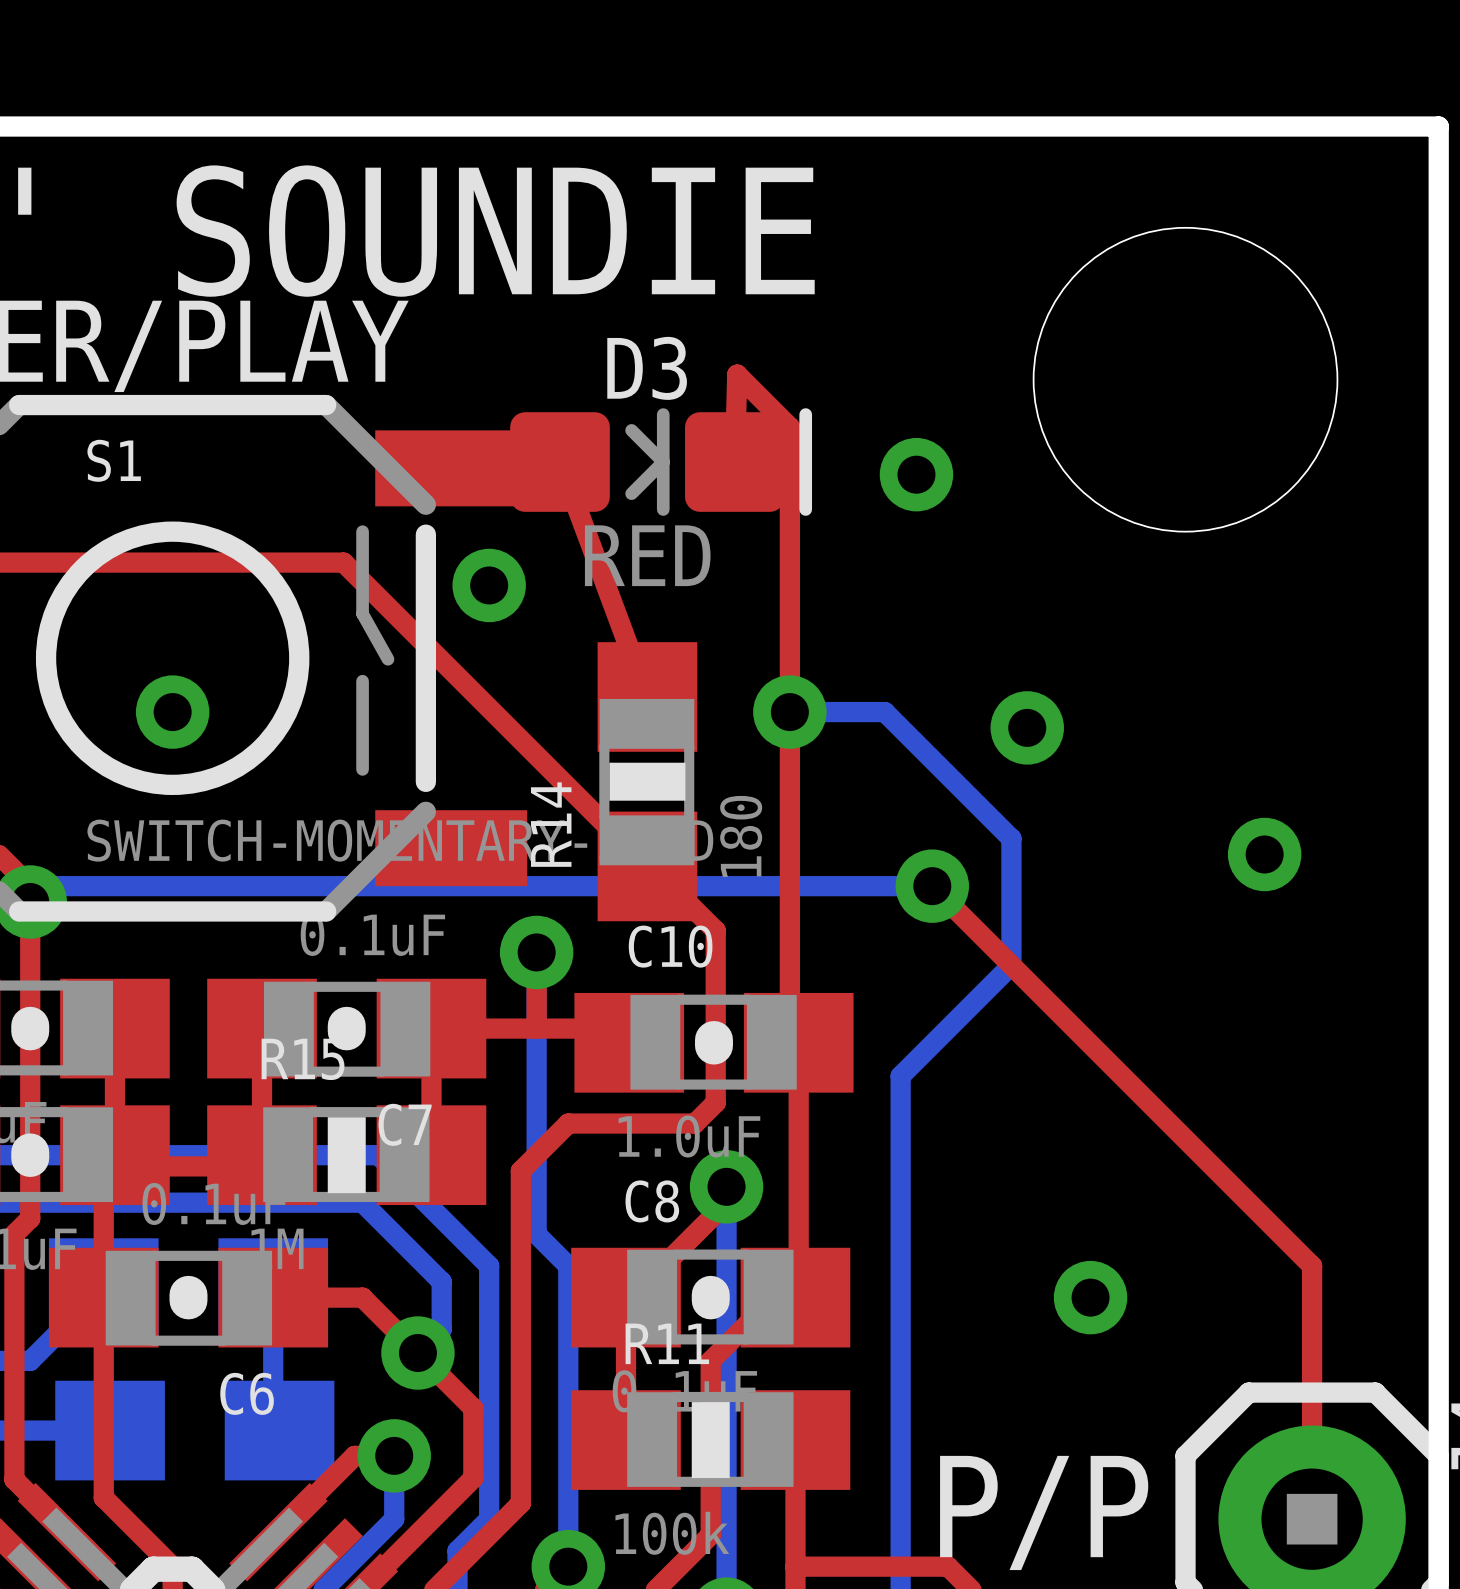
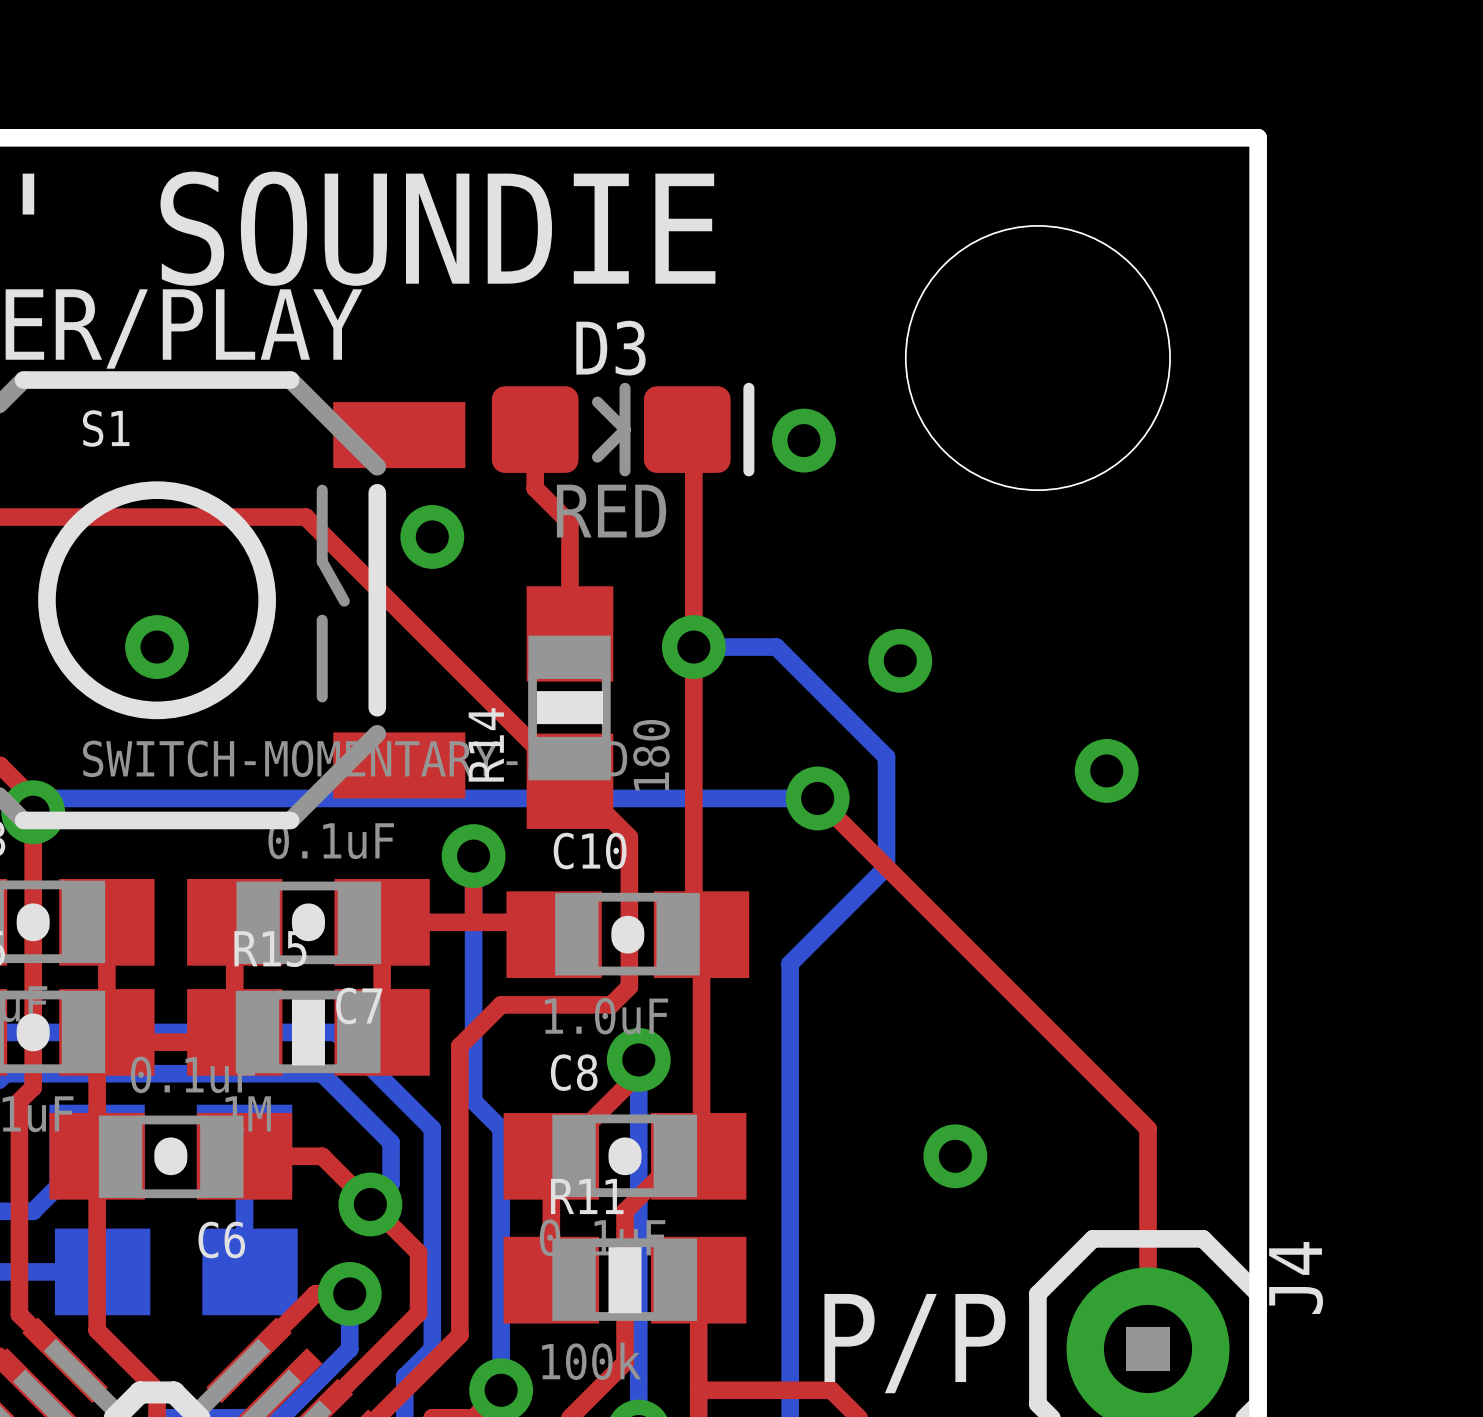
top track: (789, 427) (737, 374) (734, 462) -> none
top track: (560, 462) (647, 696) -> (535, 429) (535, 488) (569, 523) (569, 633)
D3 position: (661, 462) -> (623, 429)

